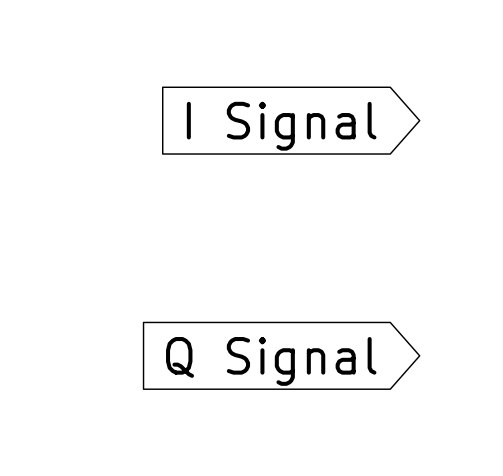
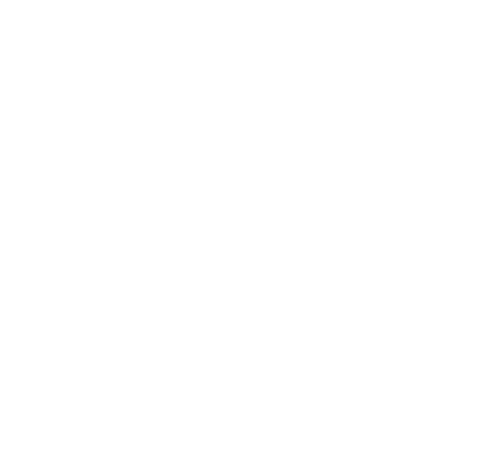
global label: I Signal (281, 126) -> none
global label: Q Signal (271, 361) -> none

